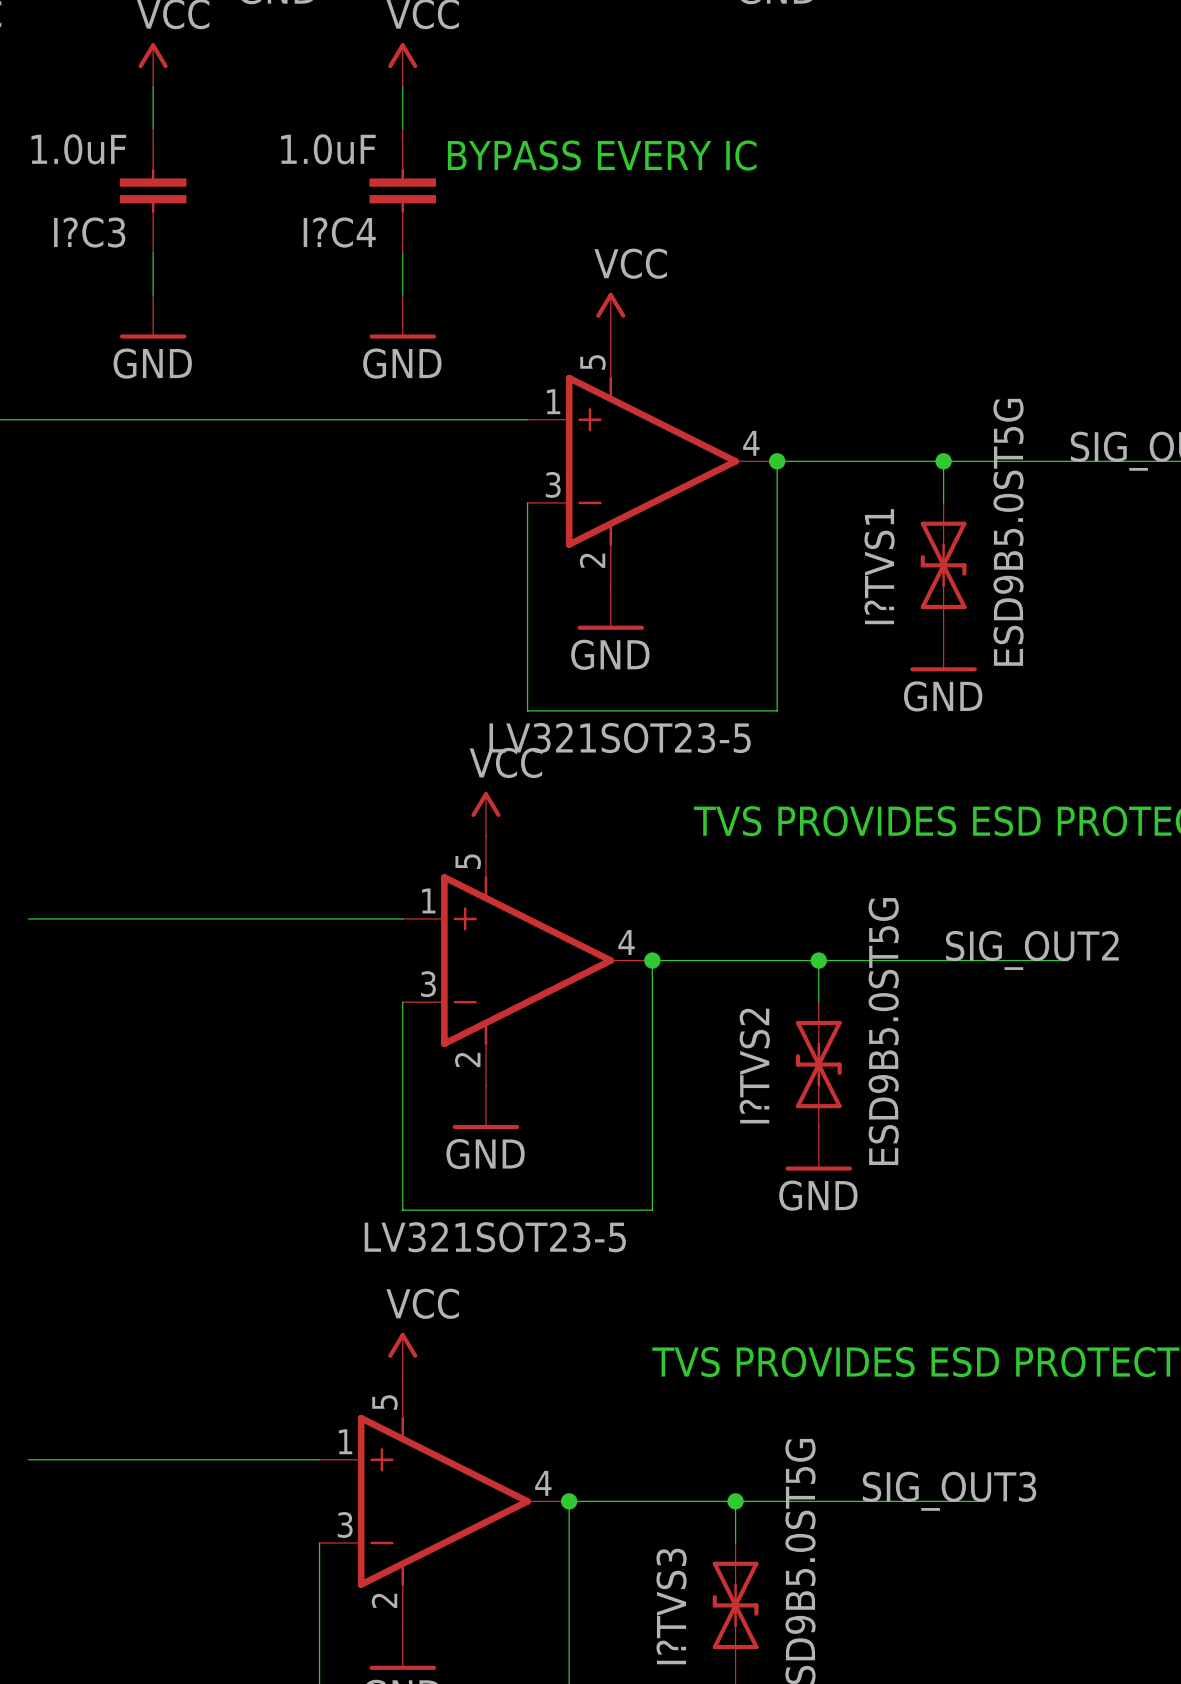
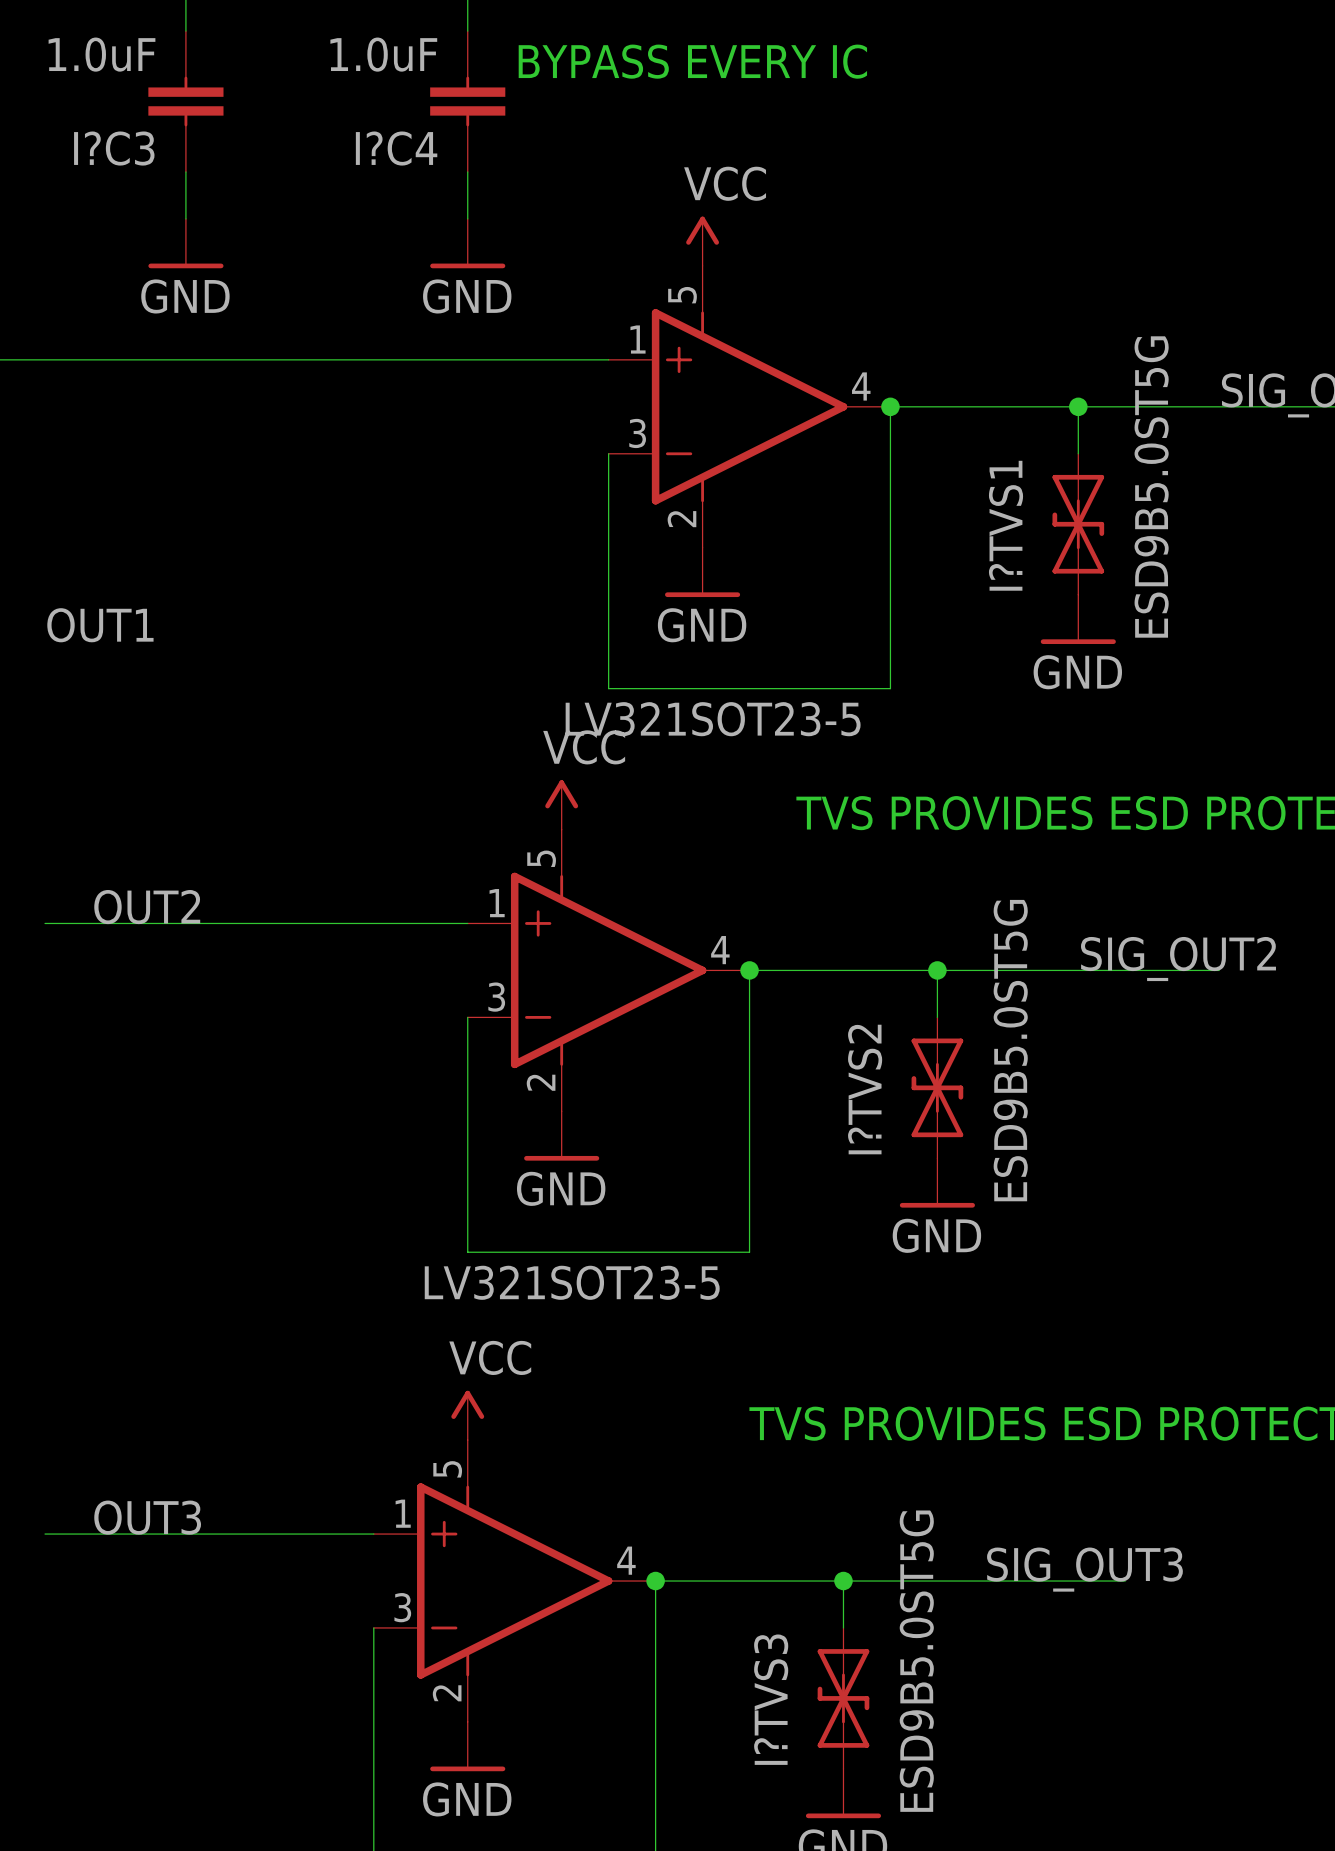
label: none -> OUT1 (100, 625)
label: none -> OUT2 (147, 907)
label: none -> OUT3 (147, 1517)

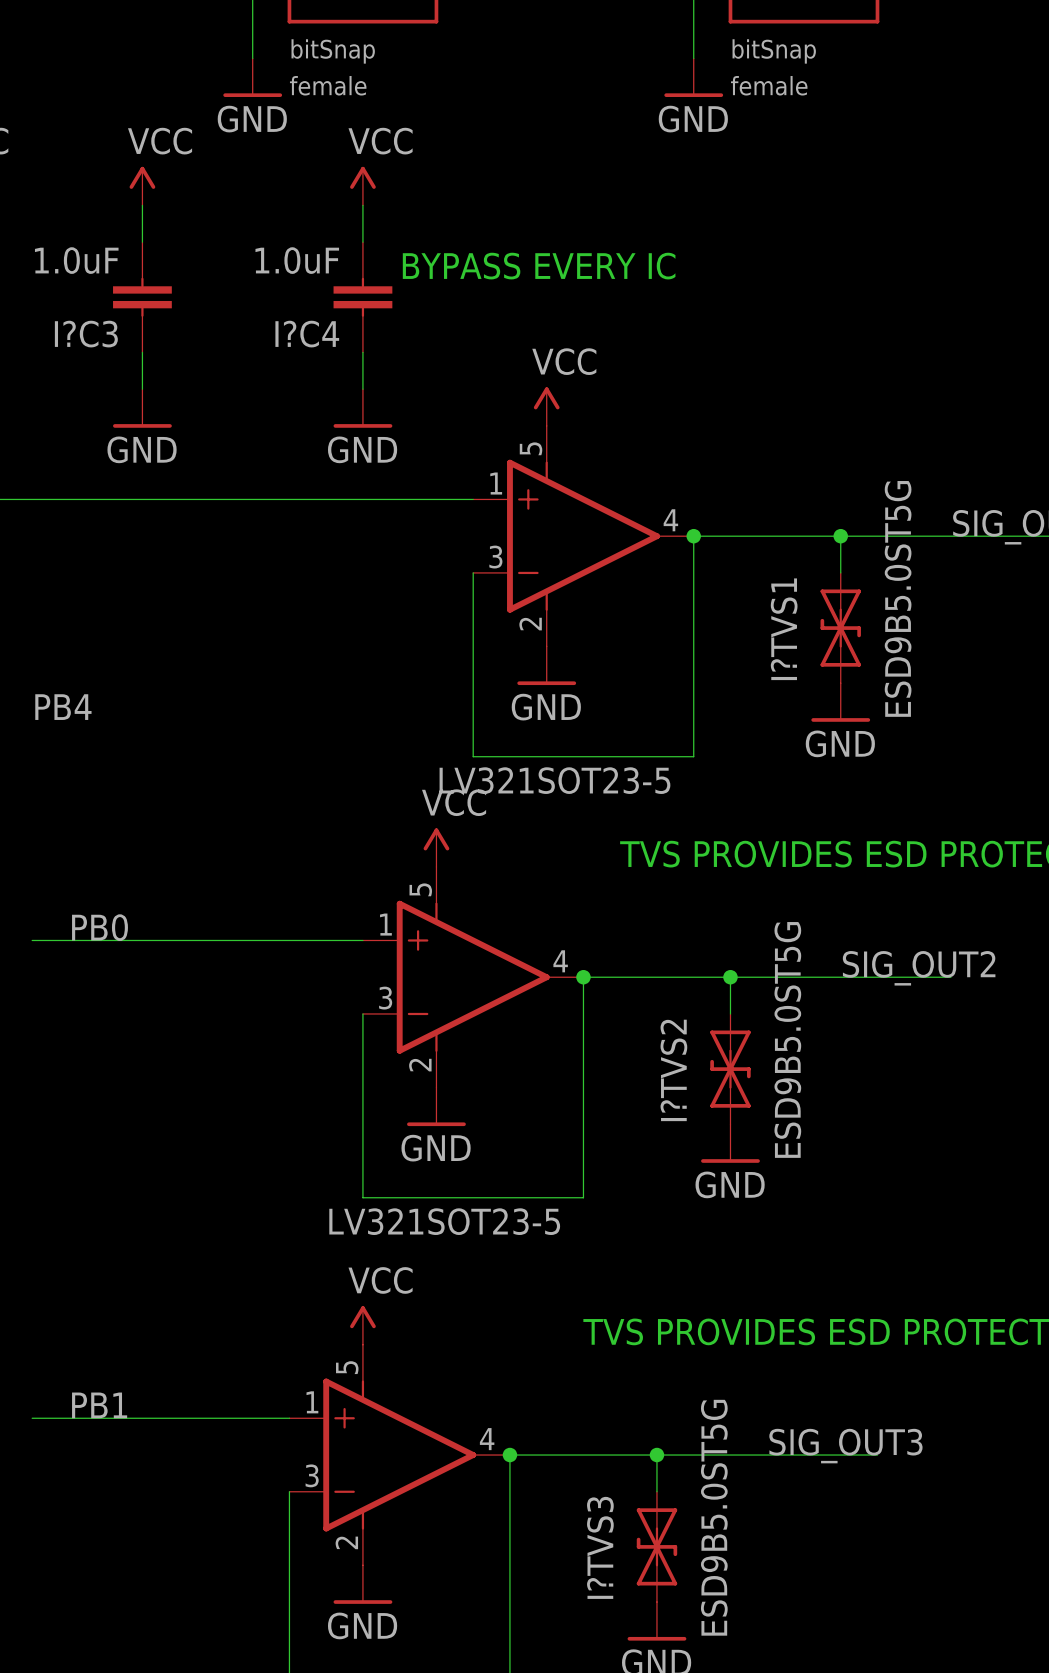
label: OUT1 (100, 625) -> PB4 (63, 707)
label: OUT2 (147, 907) -> PB0 (100, 927)
label: OUT3 (147, 1517) -> PB1 (99, 1405)

